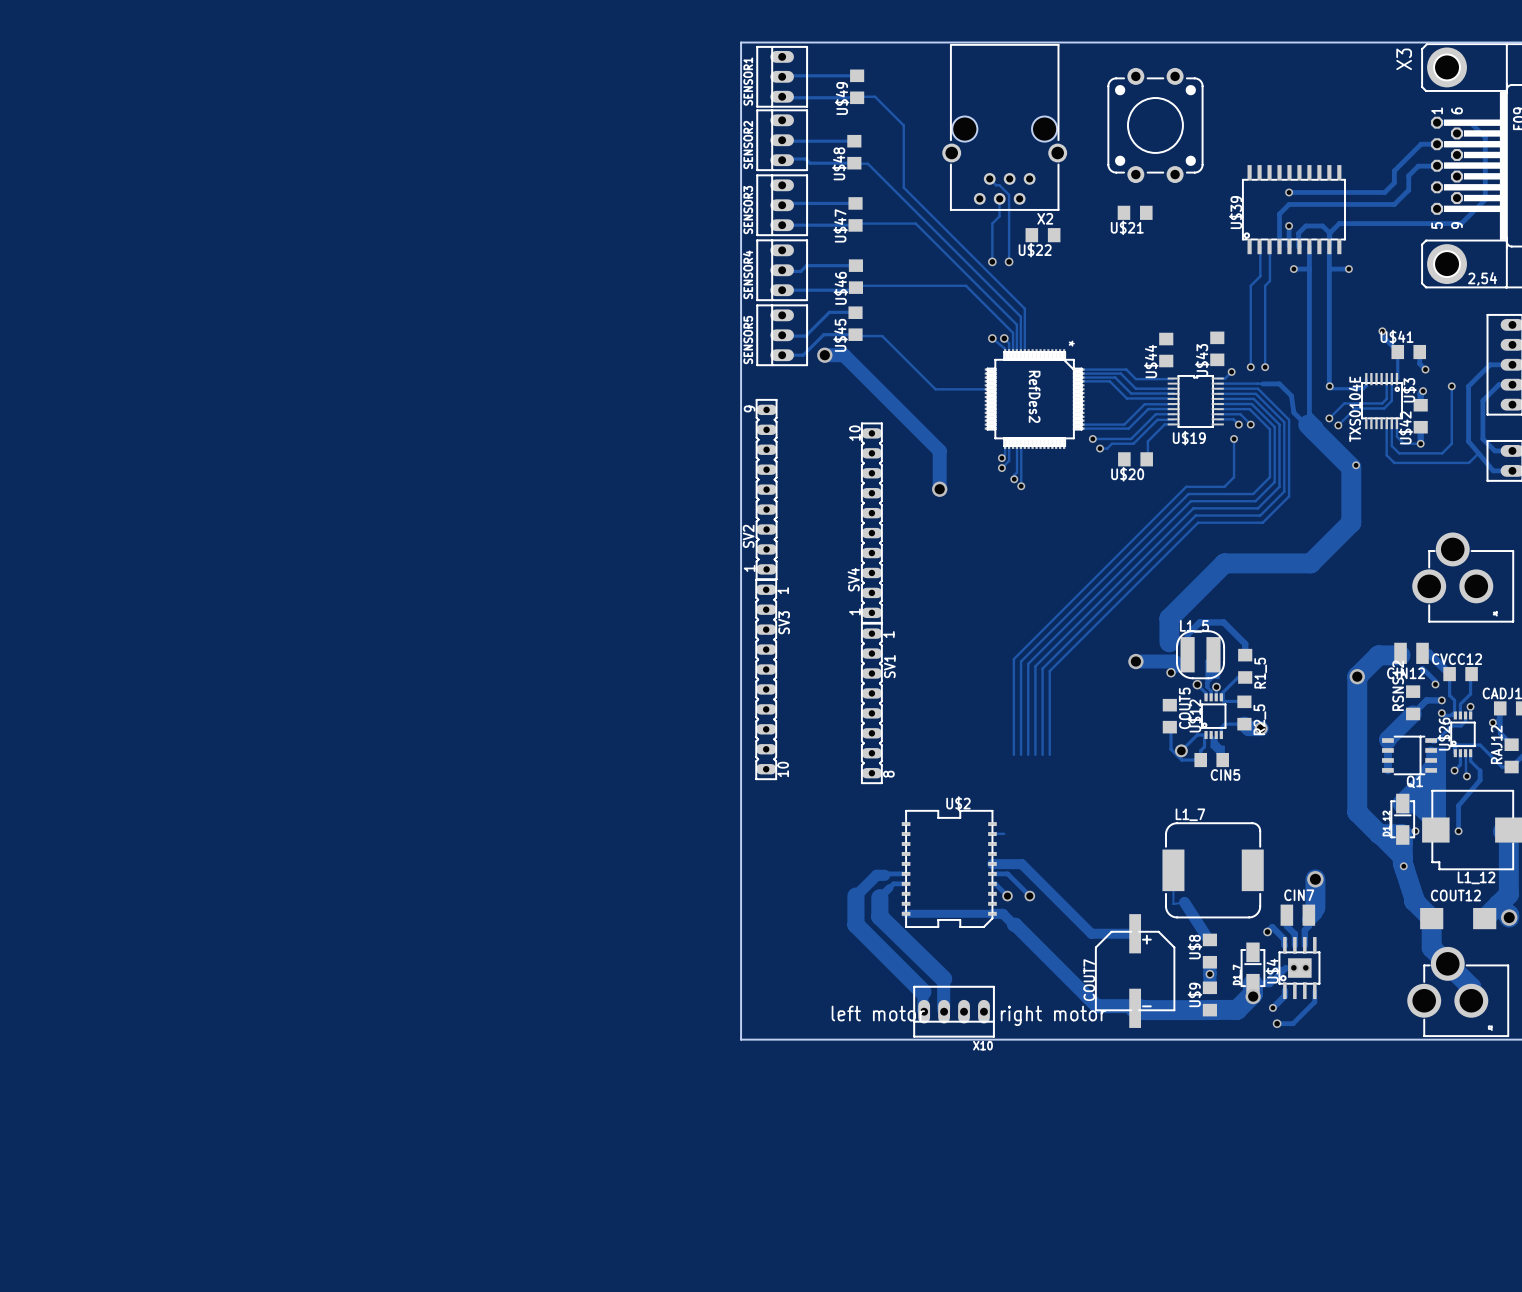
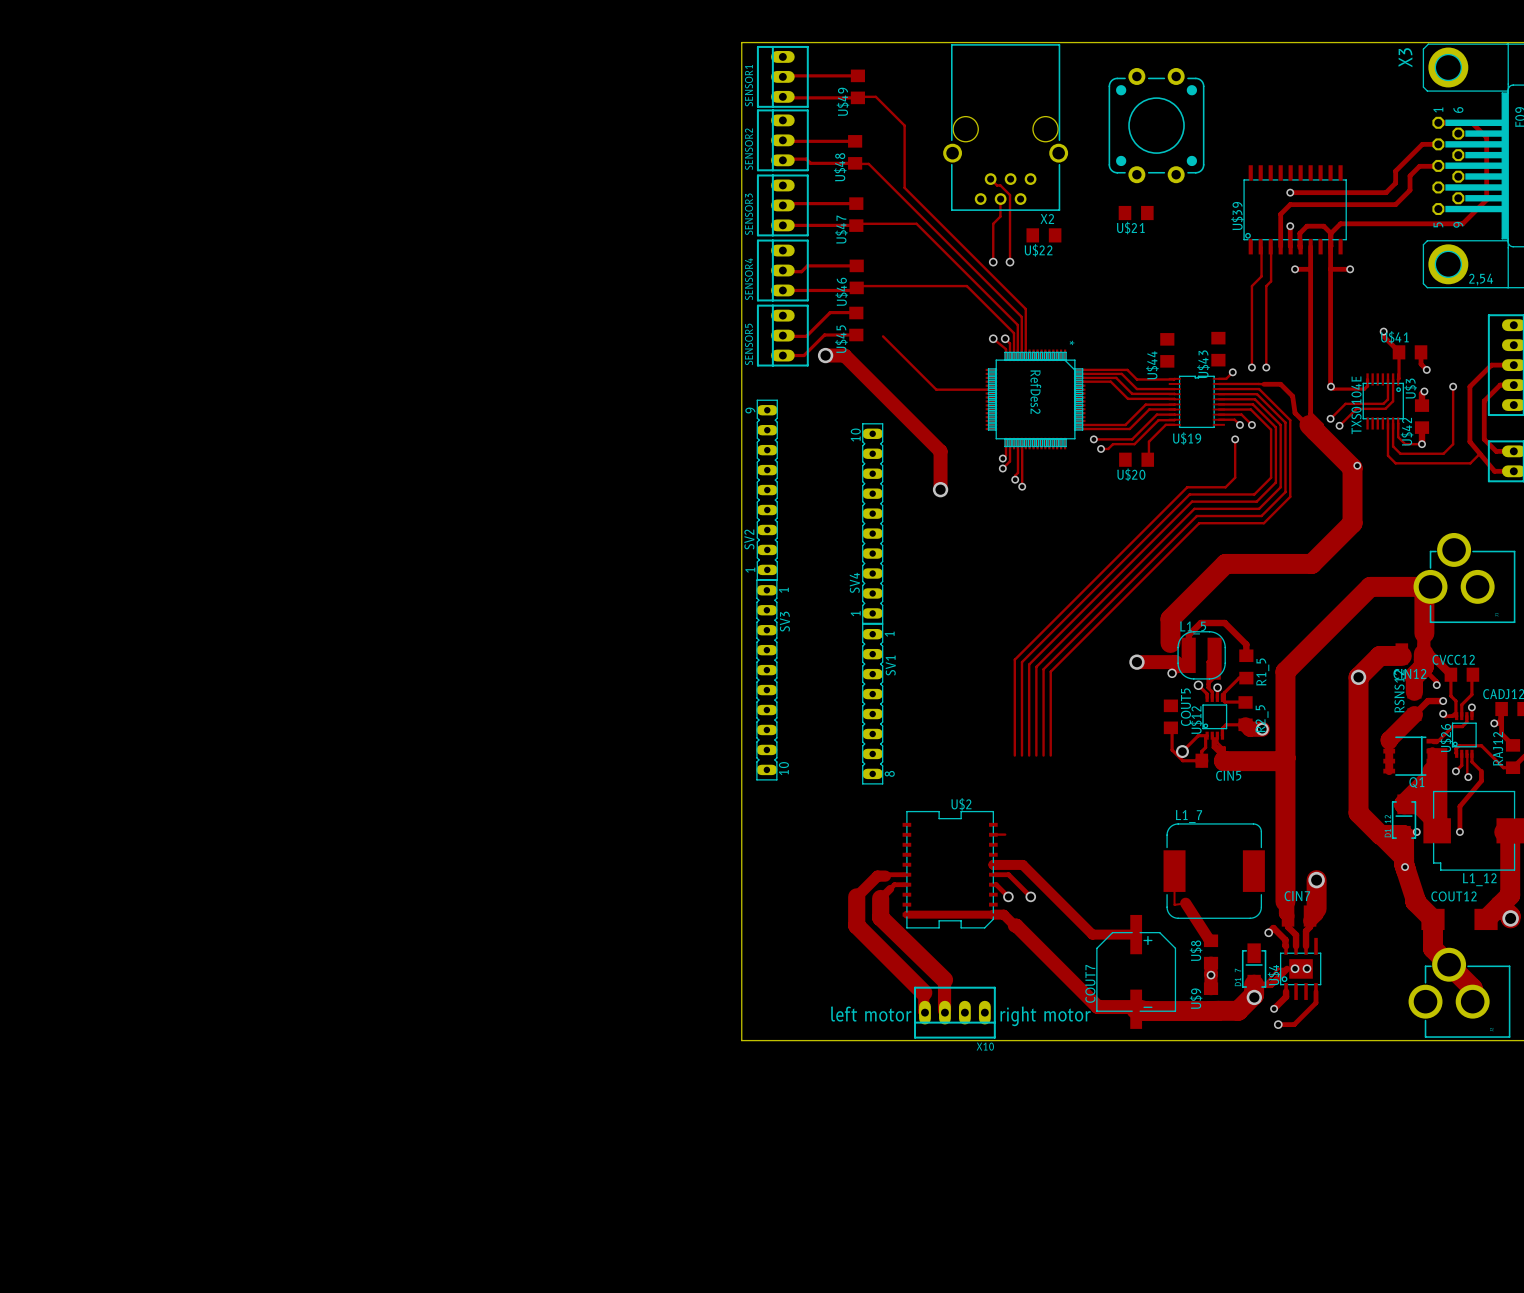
track: (855, 334) (882, 336) -> none
track: none -> (1424, 586) (1423, 659)
track: none -> (1430, 586) (1370, 586) (1285, 671) (1285, 913) (1288, 916)
track: none -> (1423, 653) (1423, 666) (1414, 676) (1414, 692)
track: none -> (1285, 757) (1282, 761) (1223, 760)

